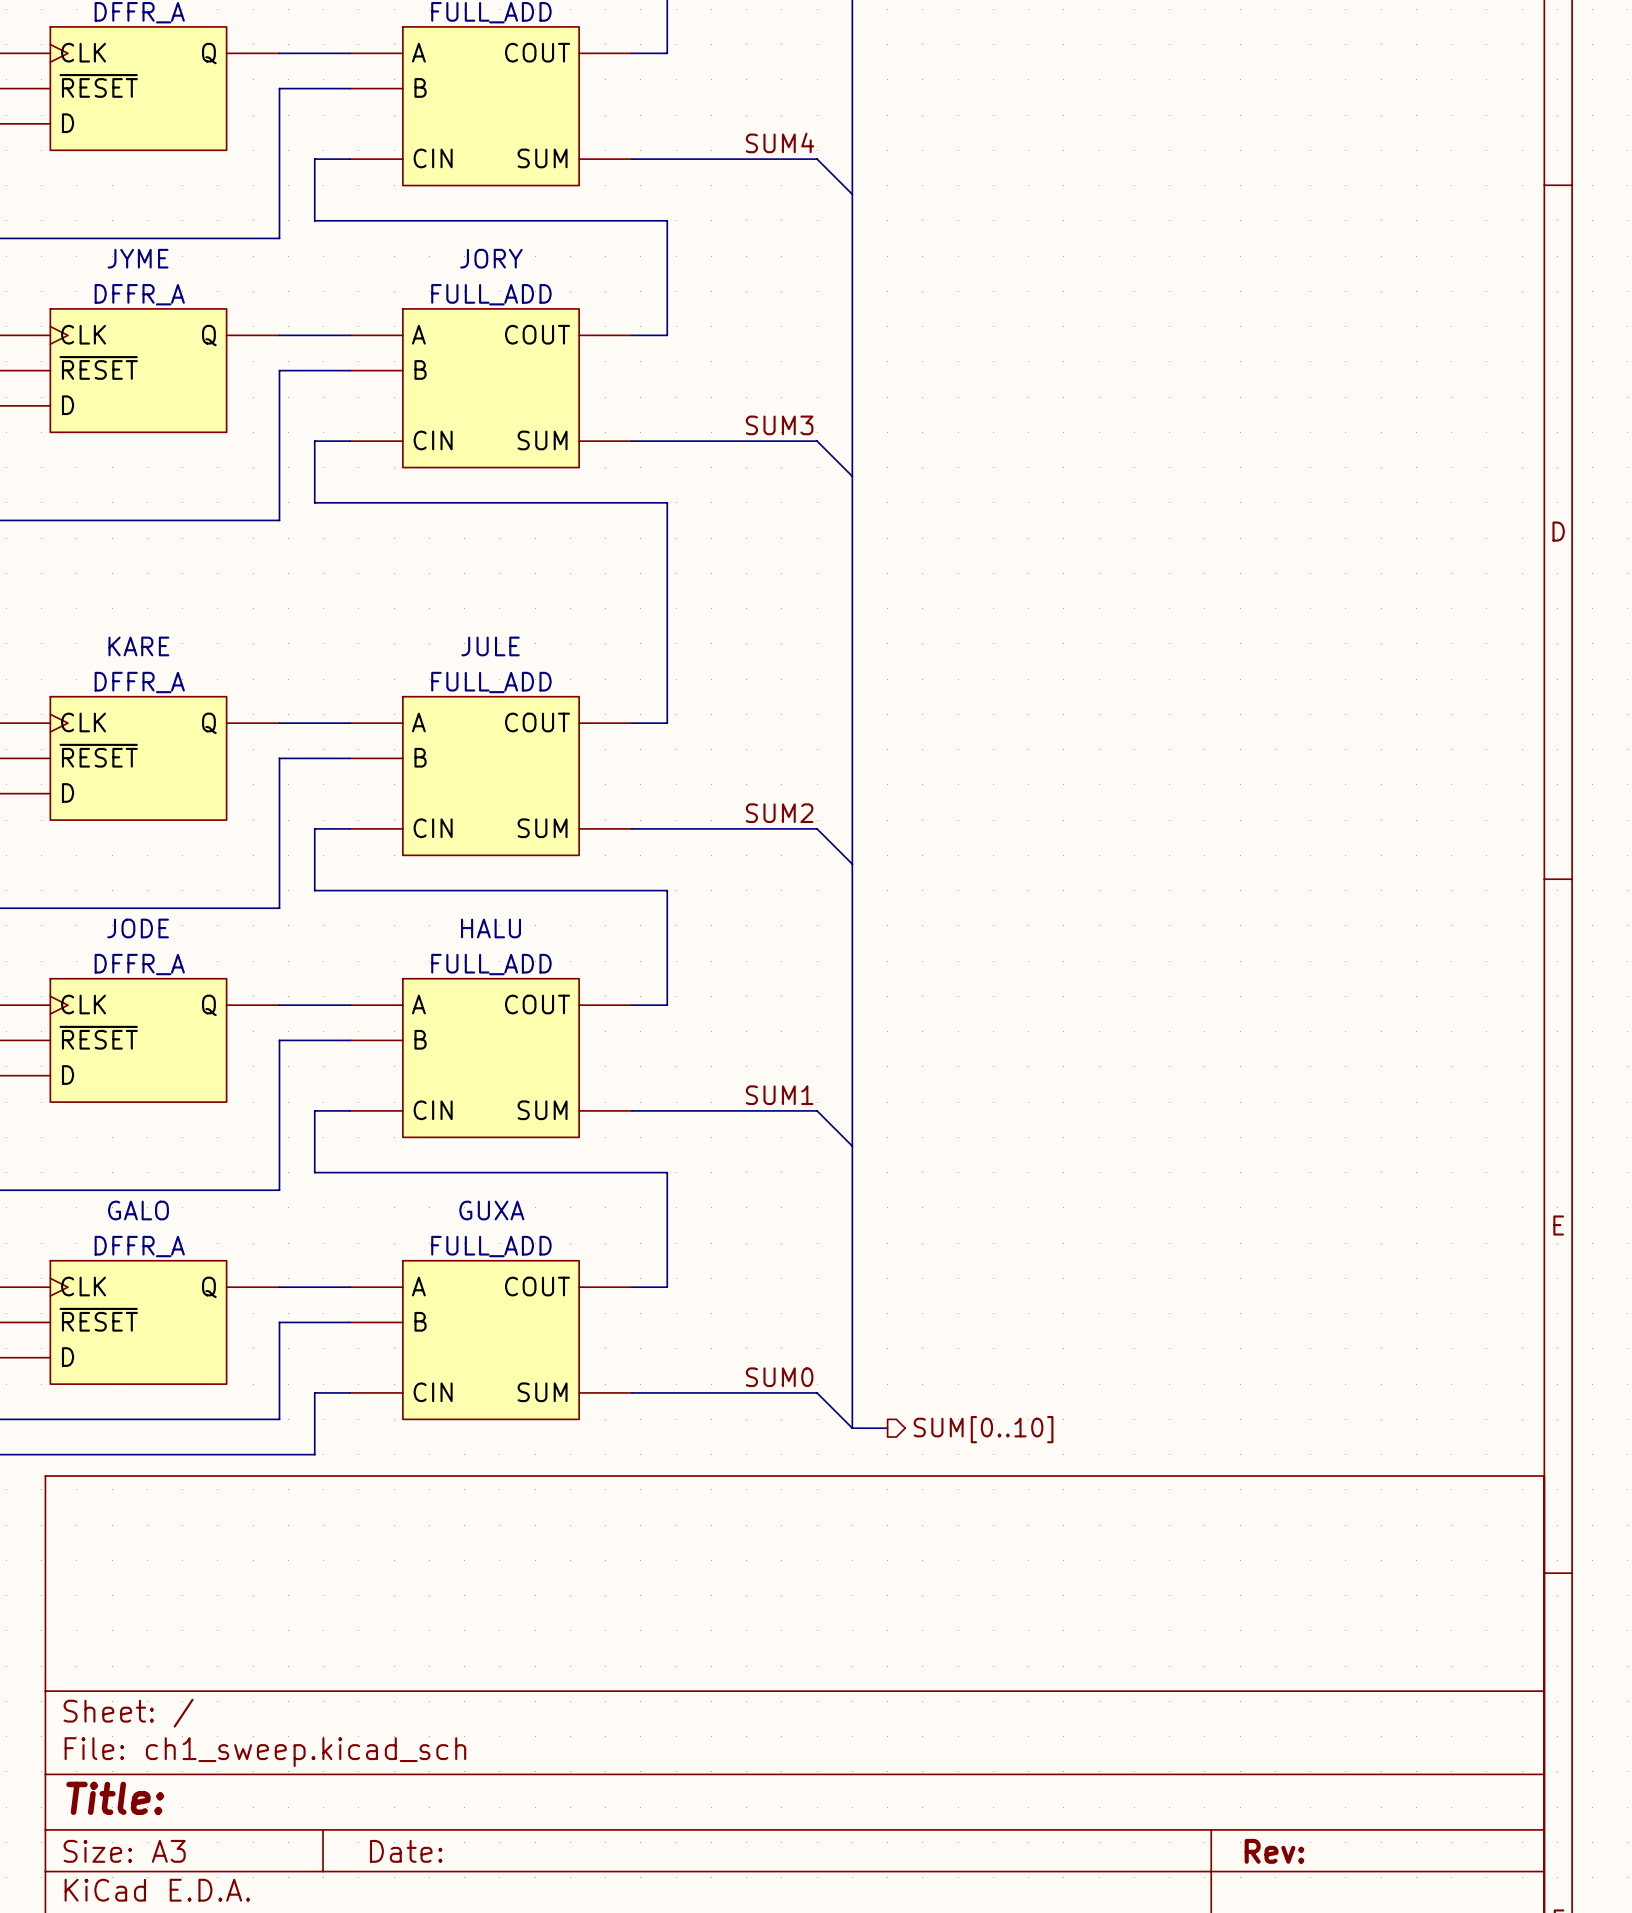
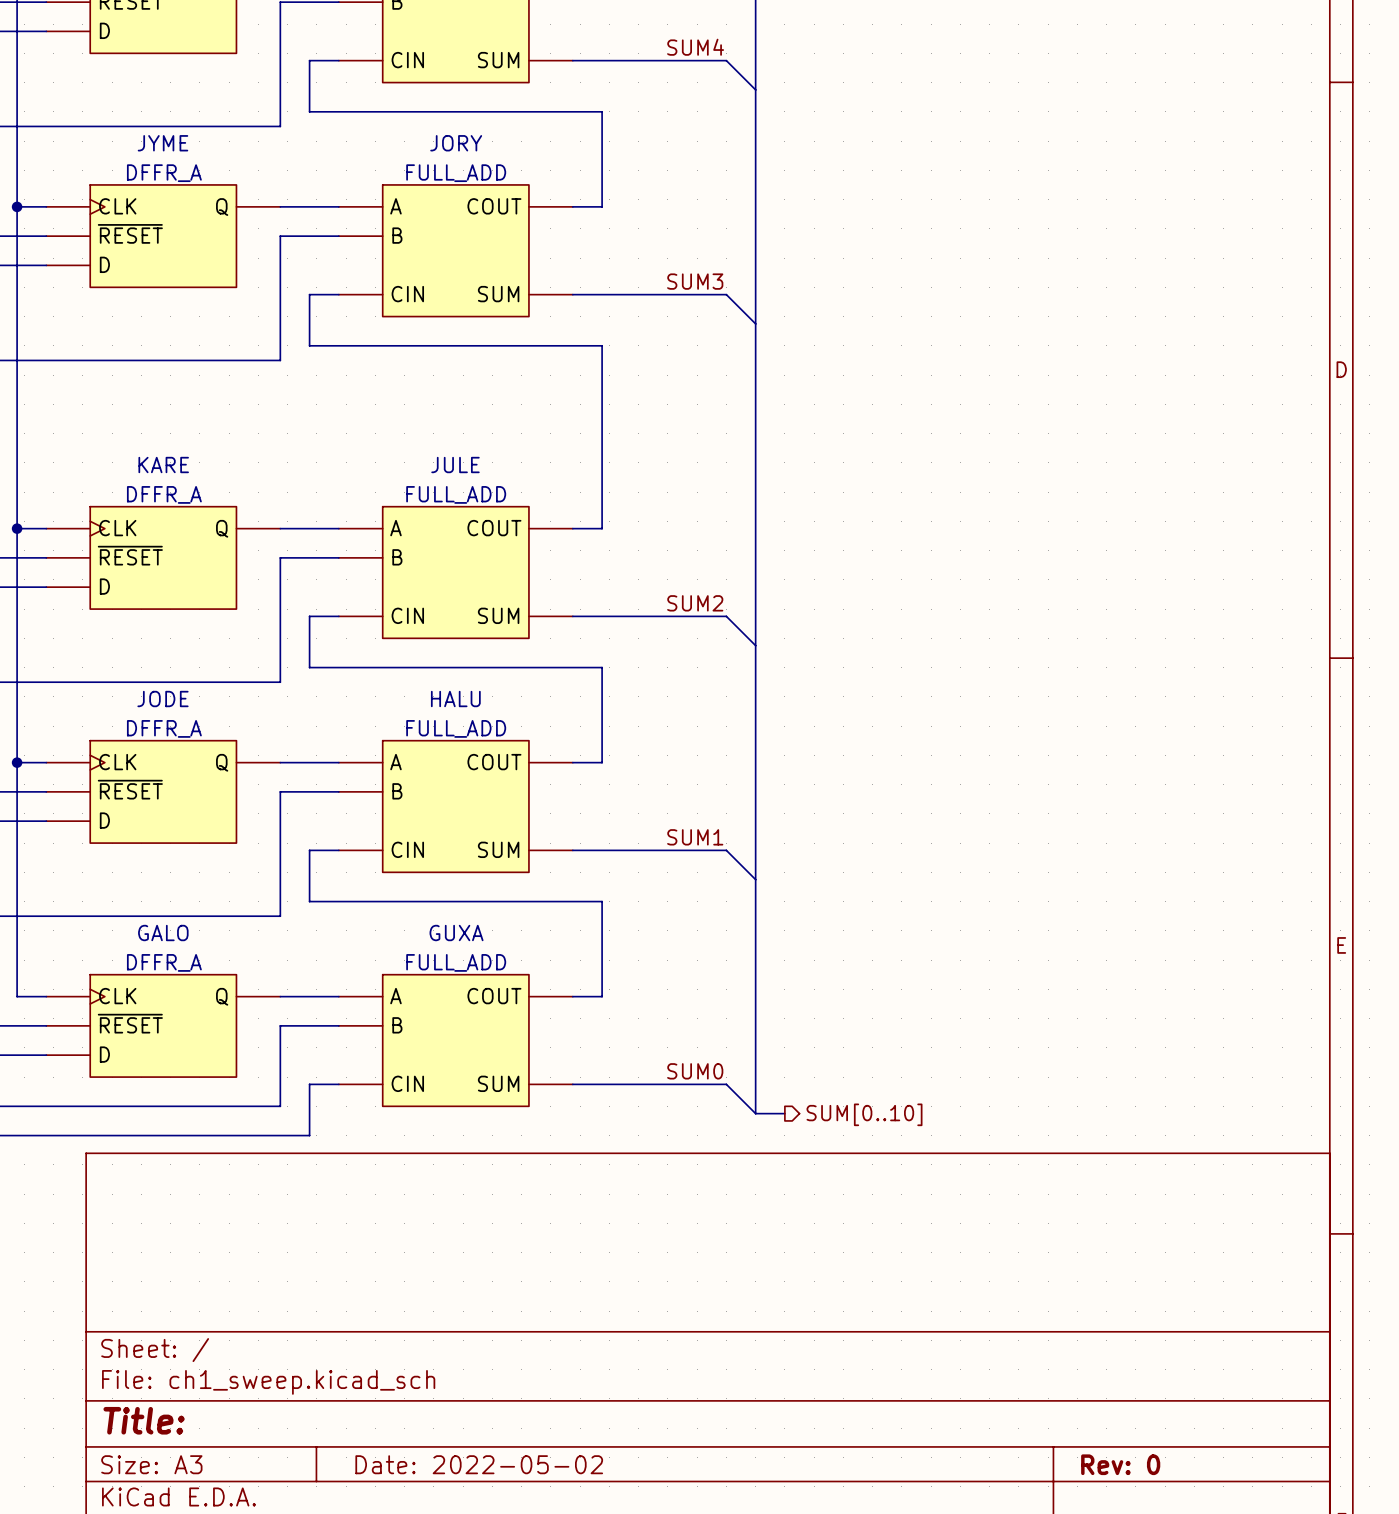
title block: Date: (406, 1851) -> Date: 2022-05-02 (479, 1464)
title block: Rev: (1274, 1851) -> Rev: 0 (1120, 1464)

